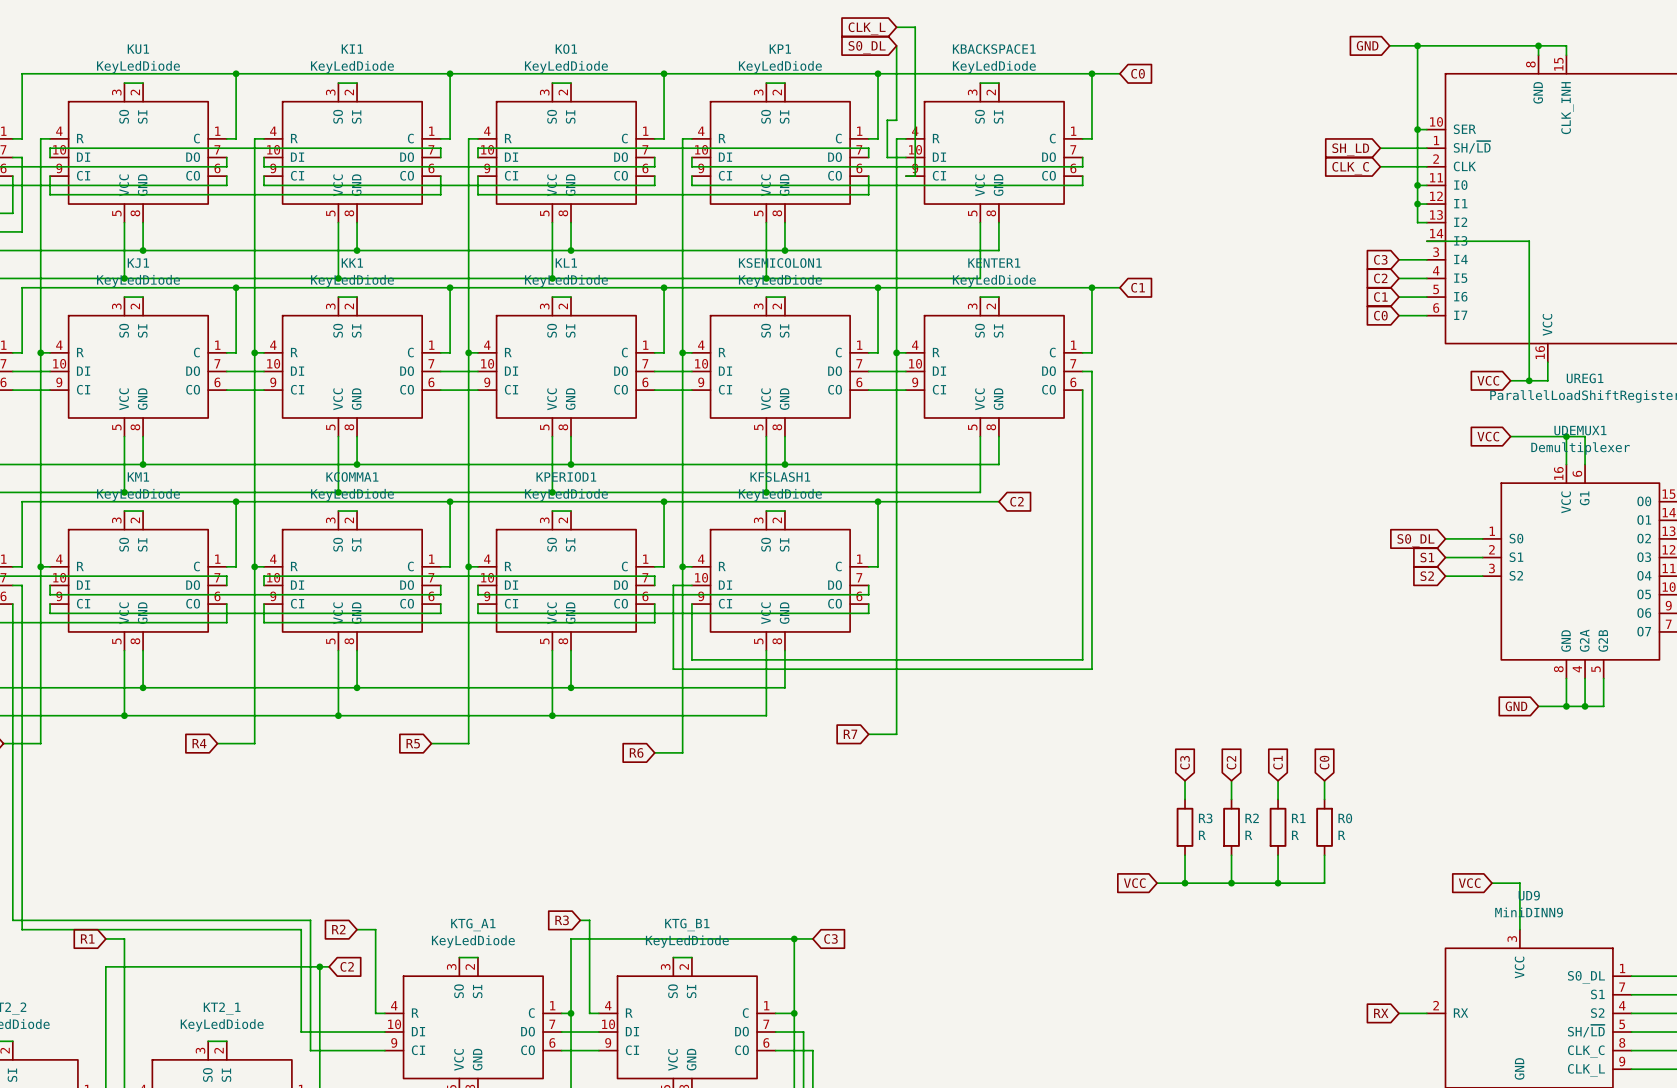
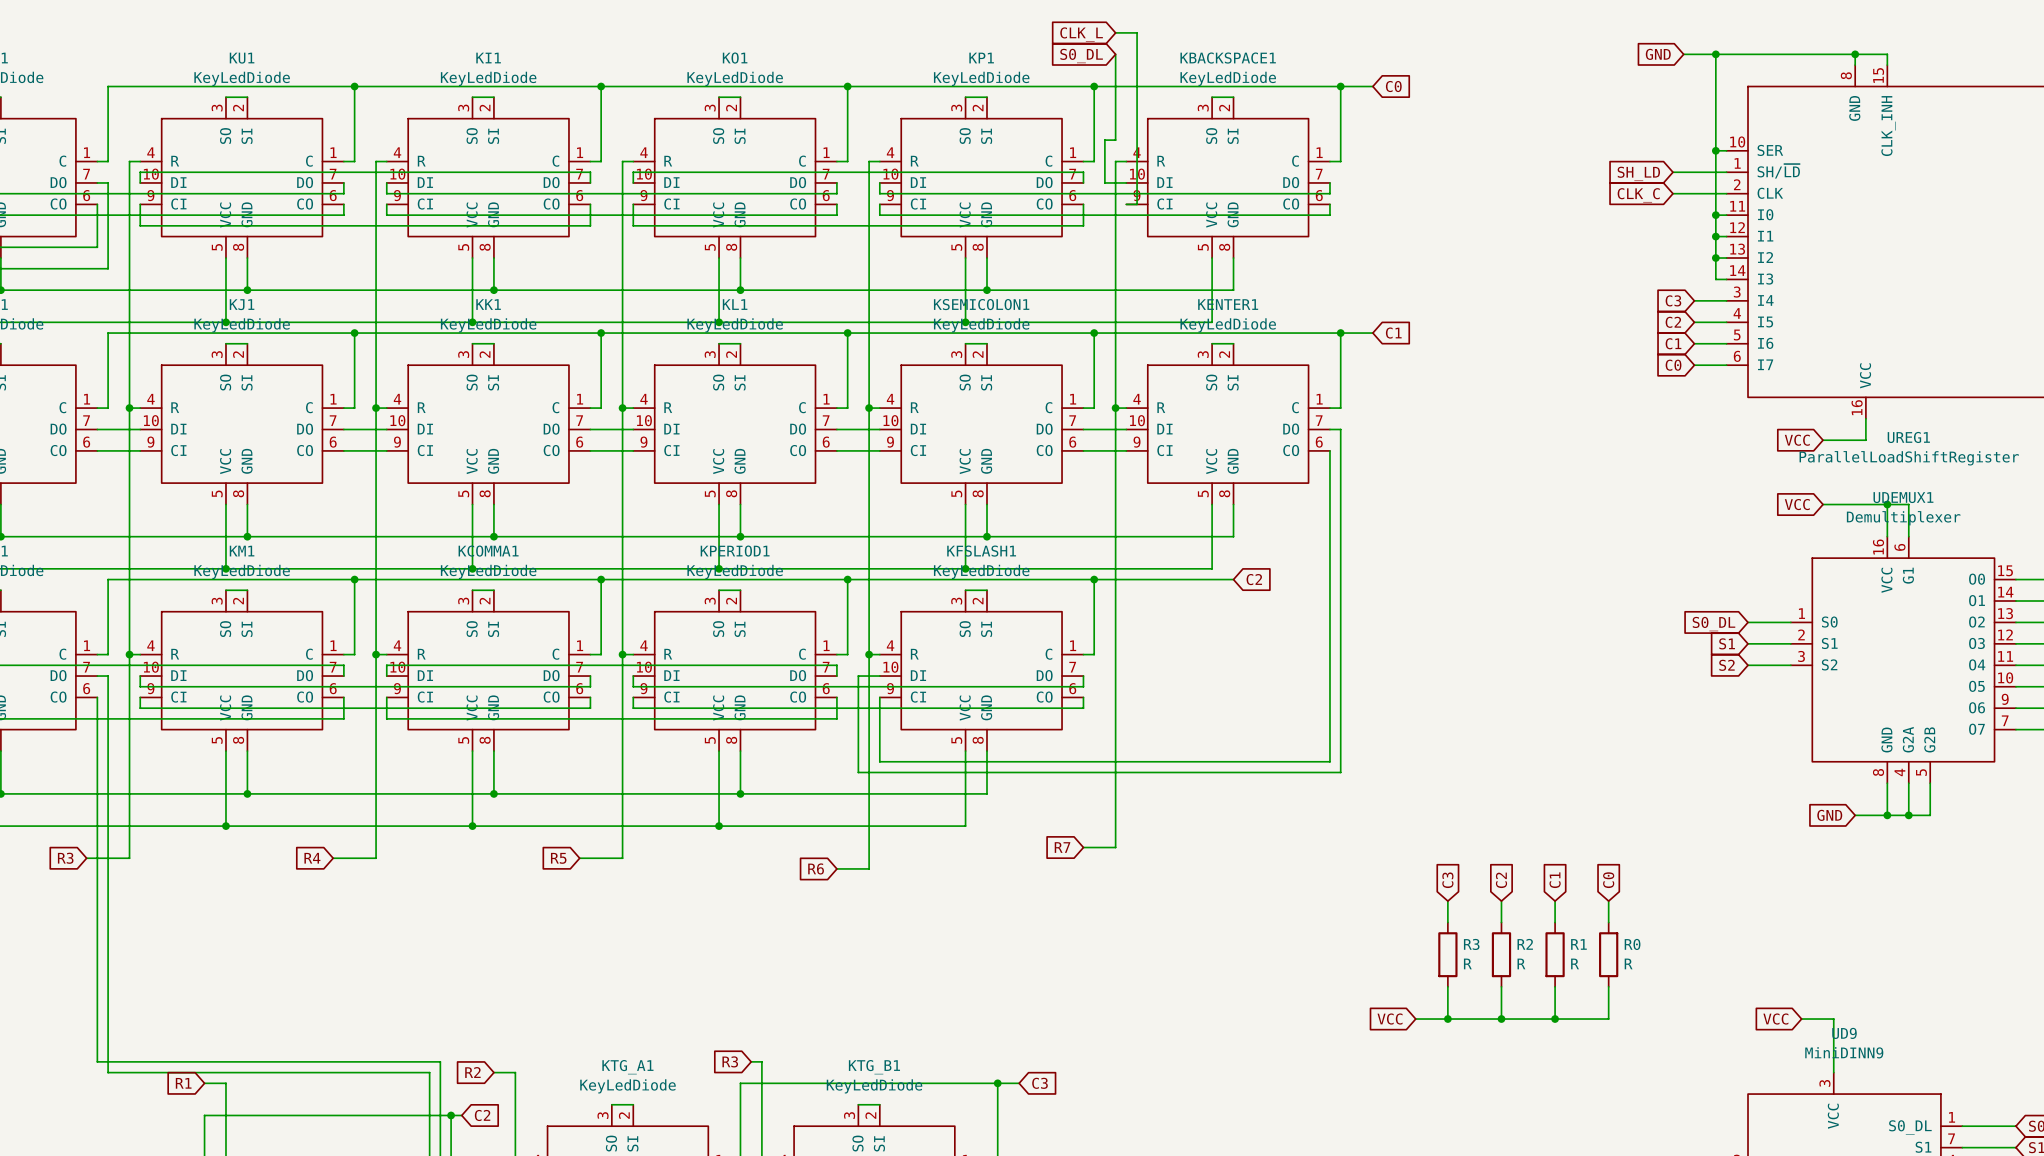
junction: none -> (1715, 258)
wire: (1426, 241) (1529, 241) (1529, 380) -> (1726, 279) (1715, 279) (1715, 258)
junction: (1529, 380) -> none

